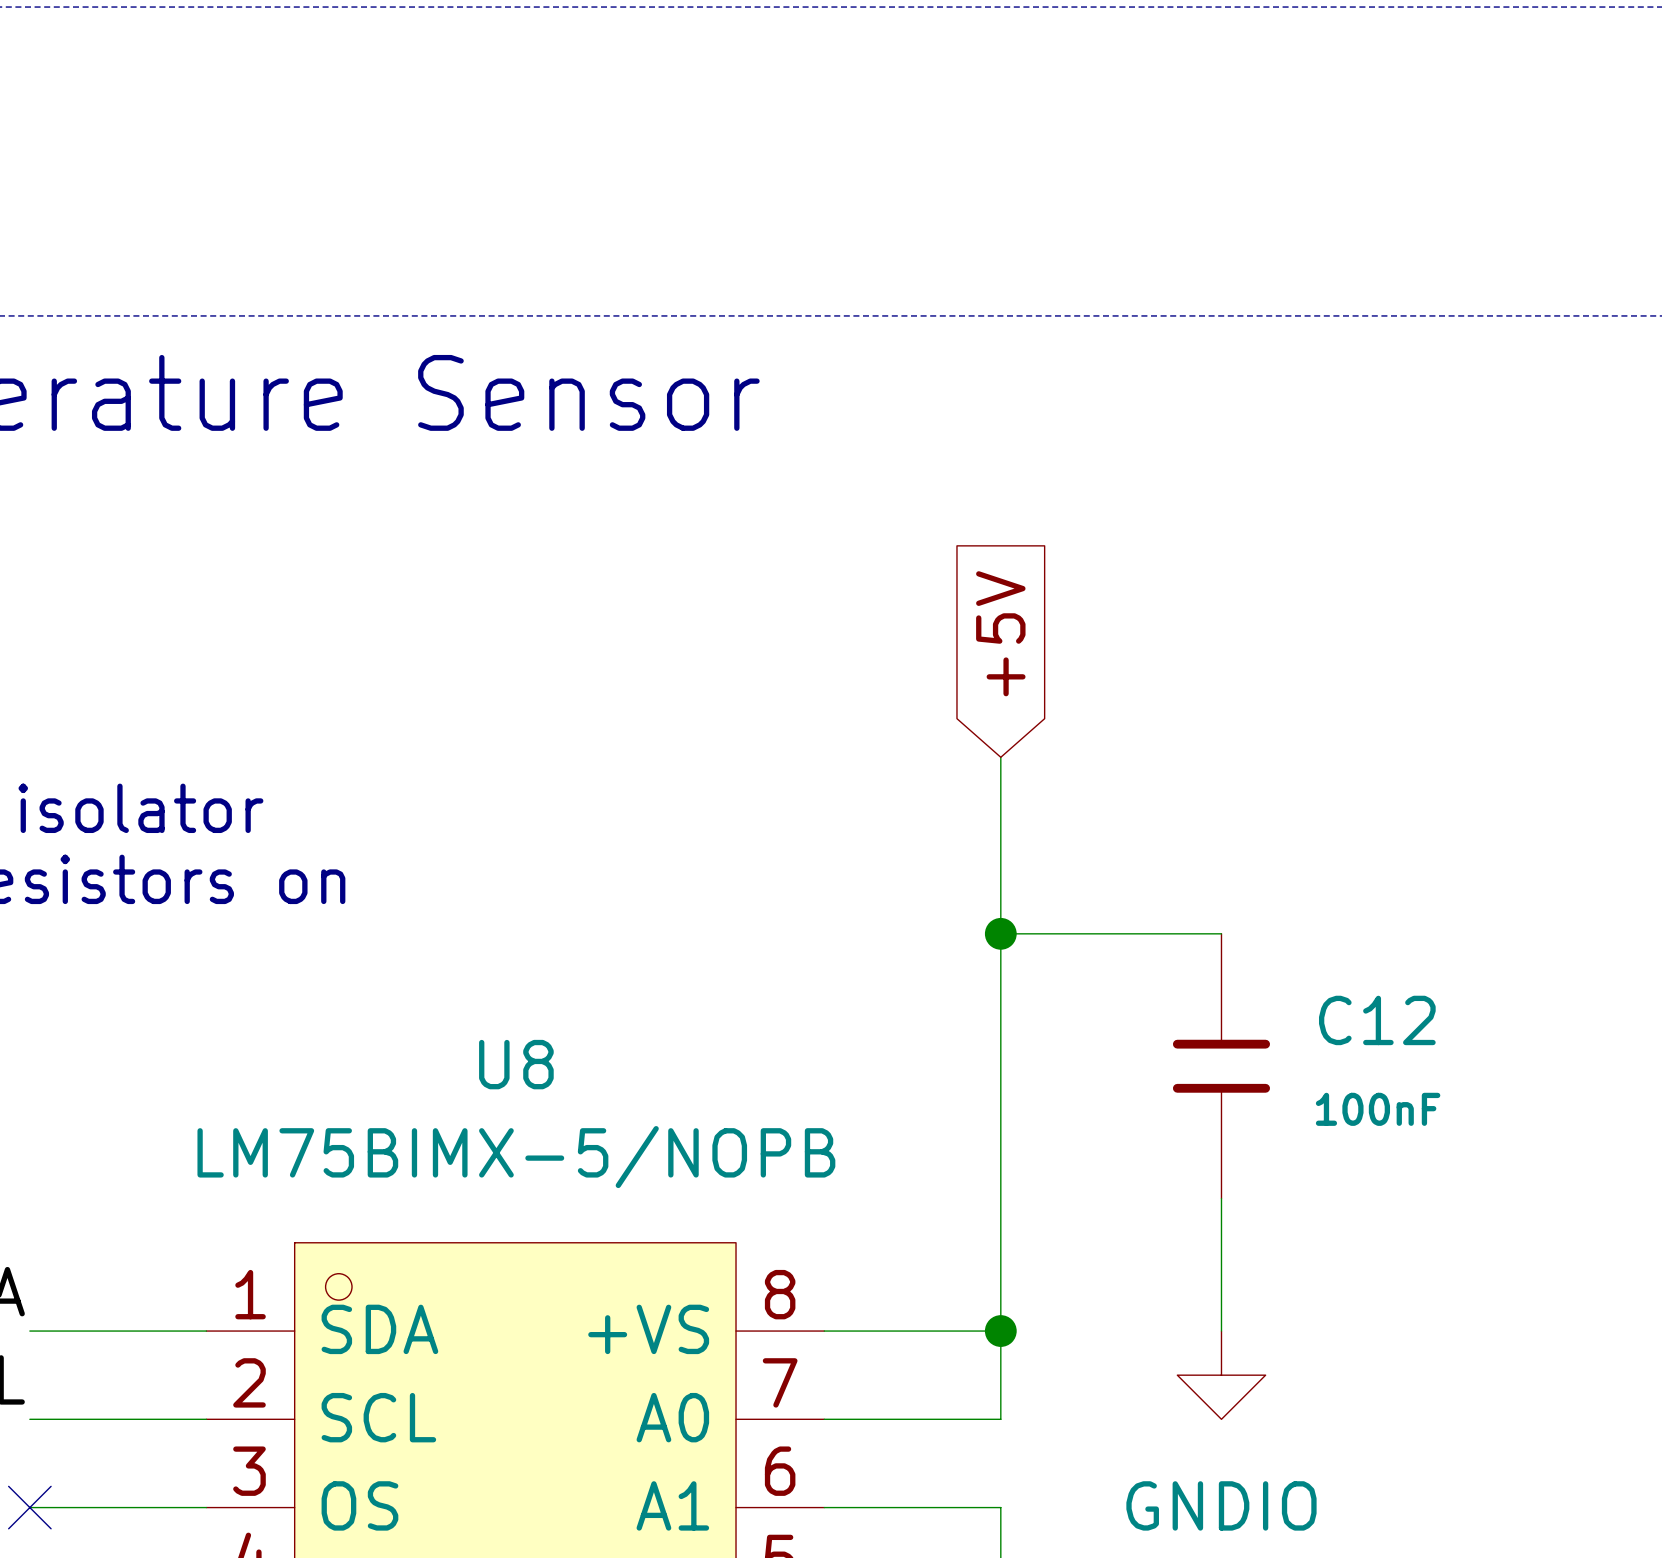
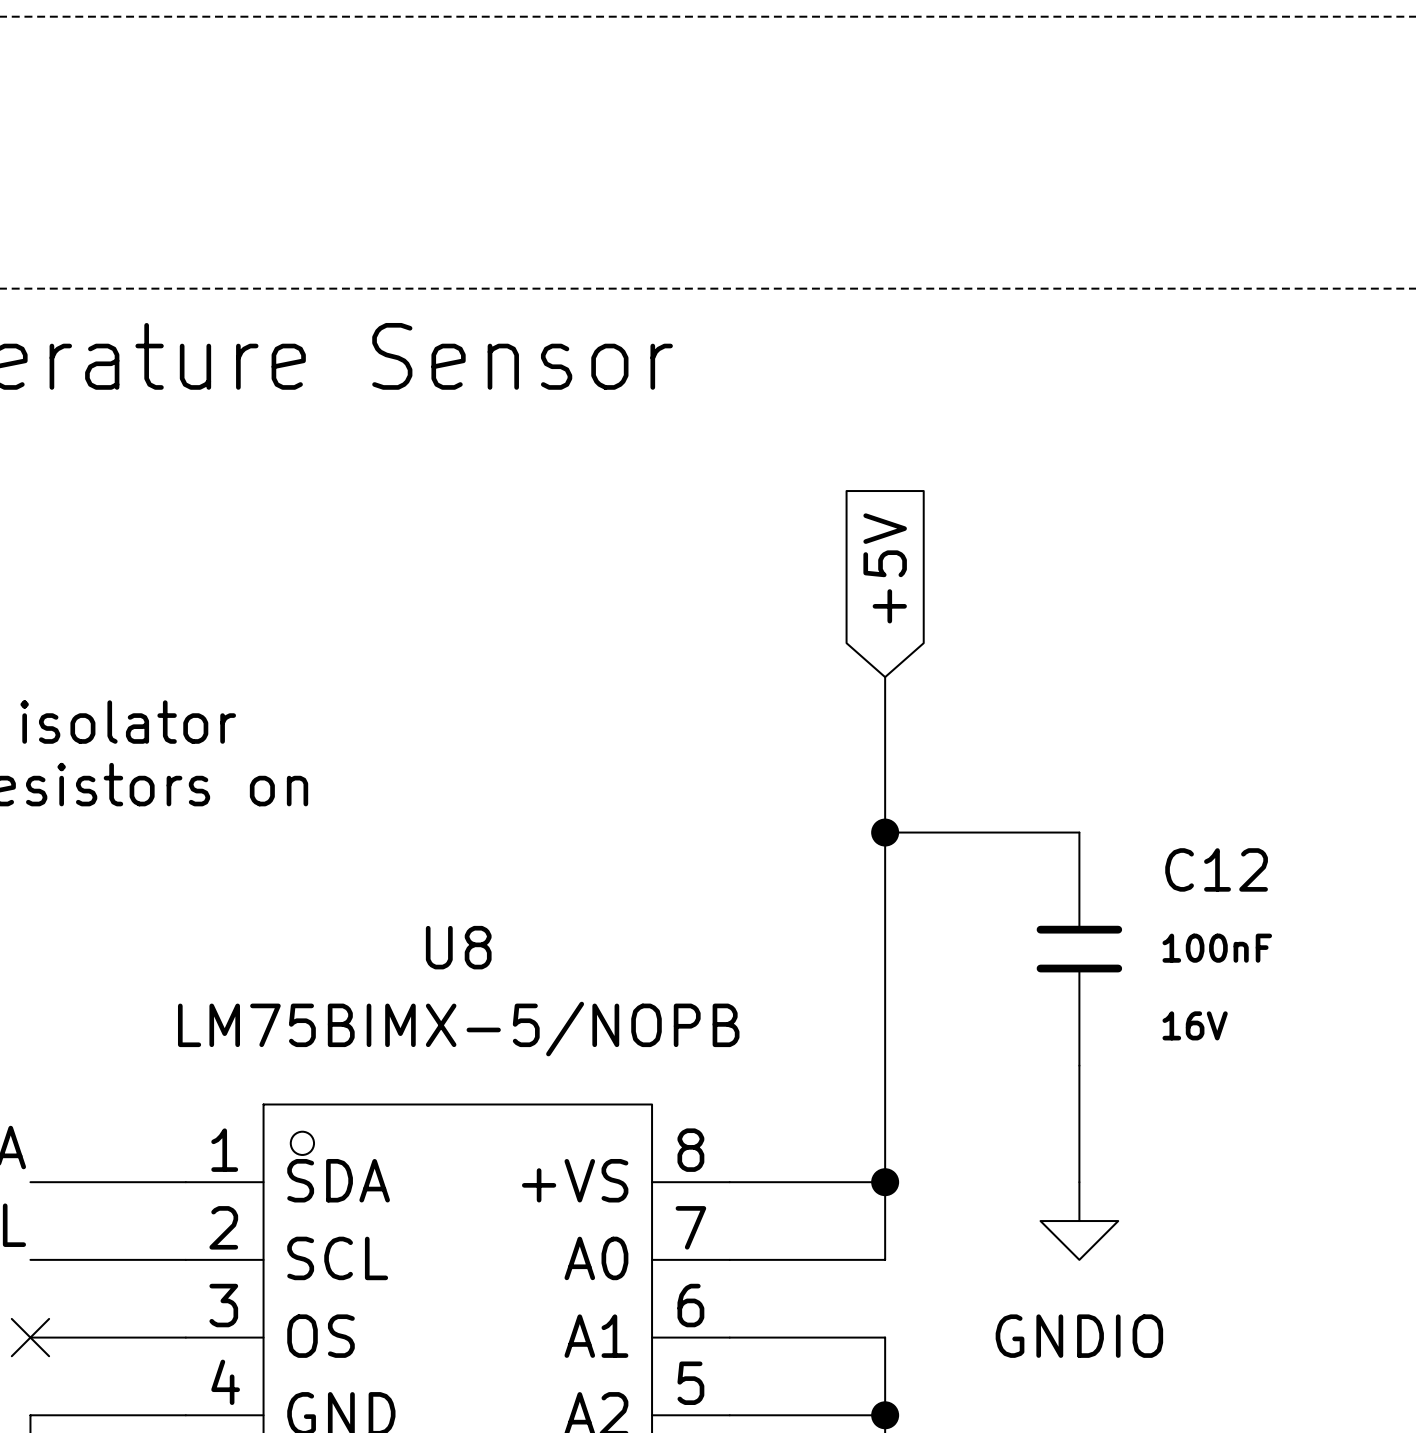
C12 name position: C12 (1377, 1020) -> C12 (1216, 869)
C12 value position: 100nF (1378, 1109) -> 100nF (1217, 948)
C12 text: none -> 16V (1195, 1025)

